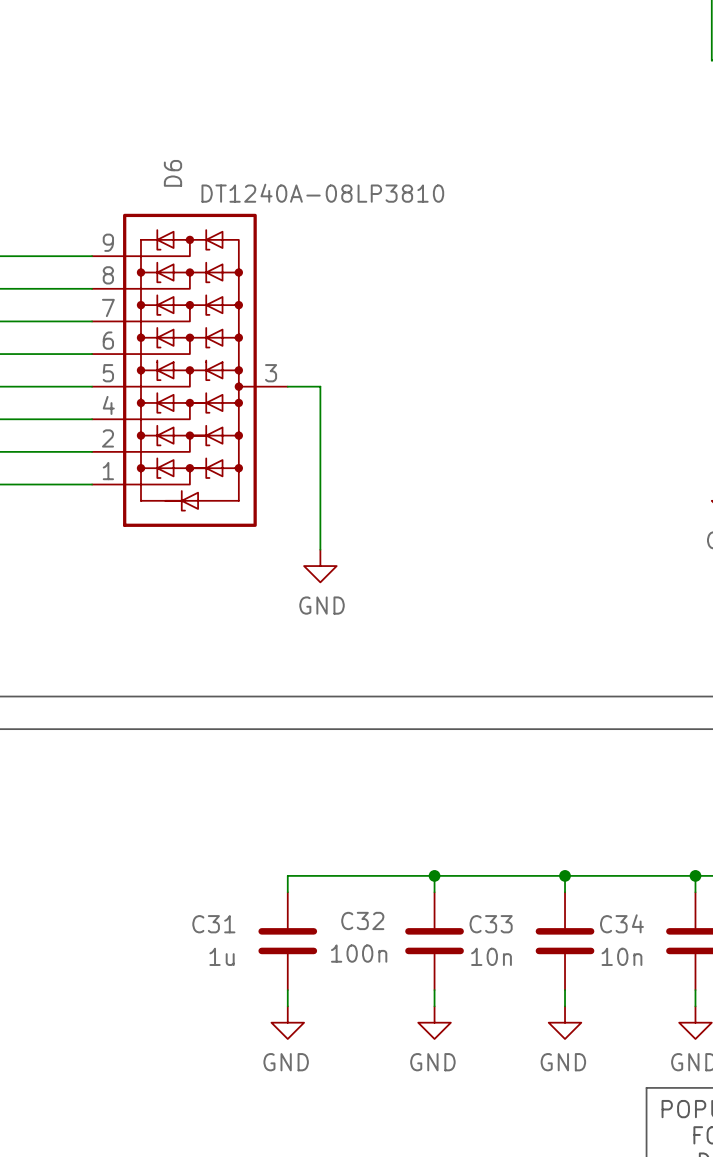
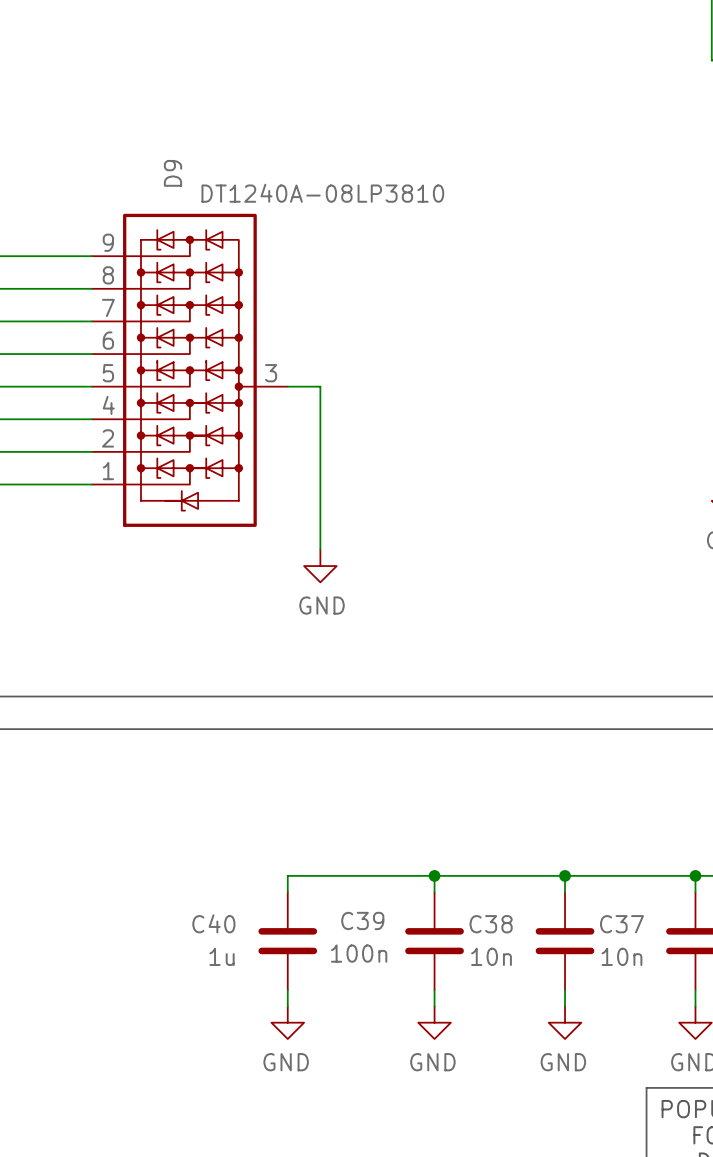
D6 name: D6 (173, 173) -> D9 (173, 173)
C32 name: C32 (362, 920) -> C39 (362, 920)
C34 name: C34 (621, 923) -> C37 (621, 924)
C31 name: C31 (213, 924) -> C40 (213, 923)
C33 name: C33 (491, 924) -> C38 (491, 924)

